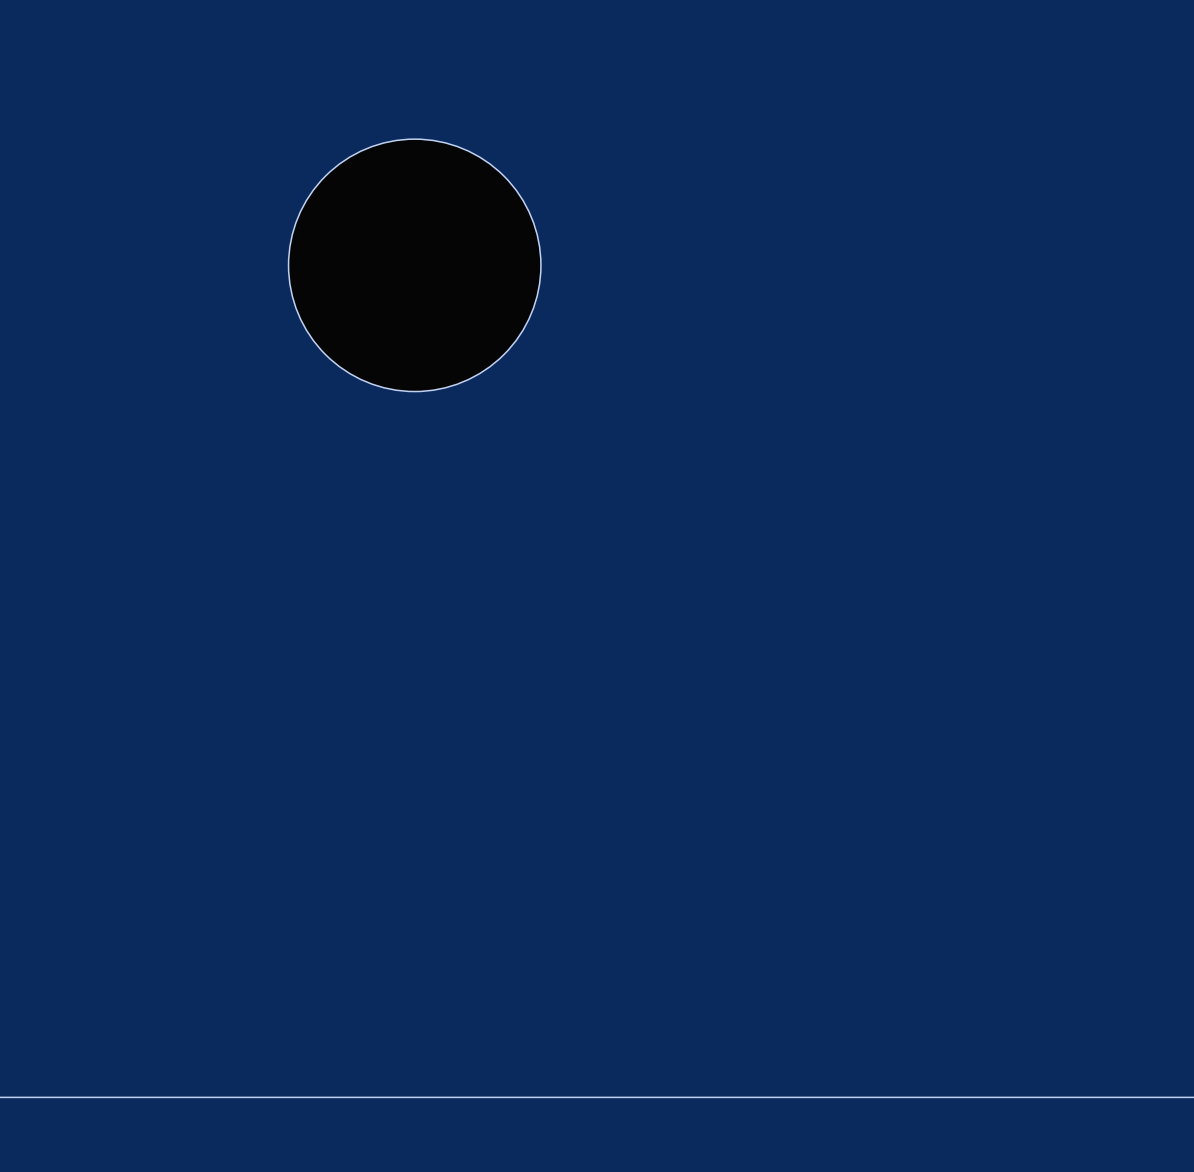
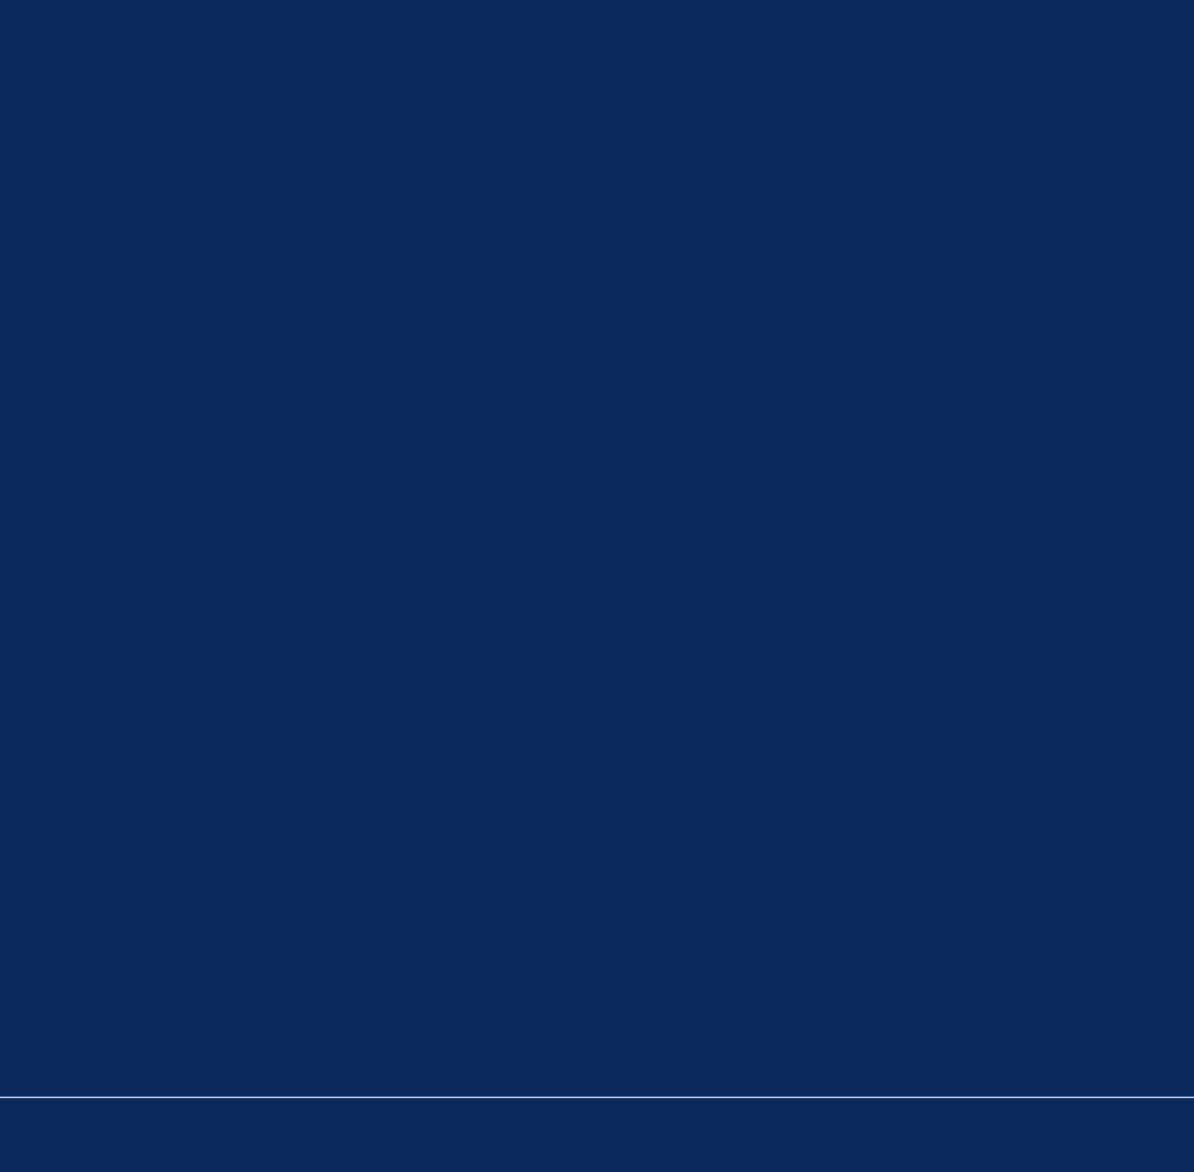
part: (414, 265) -> none

